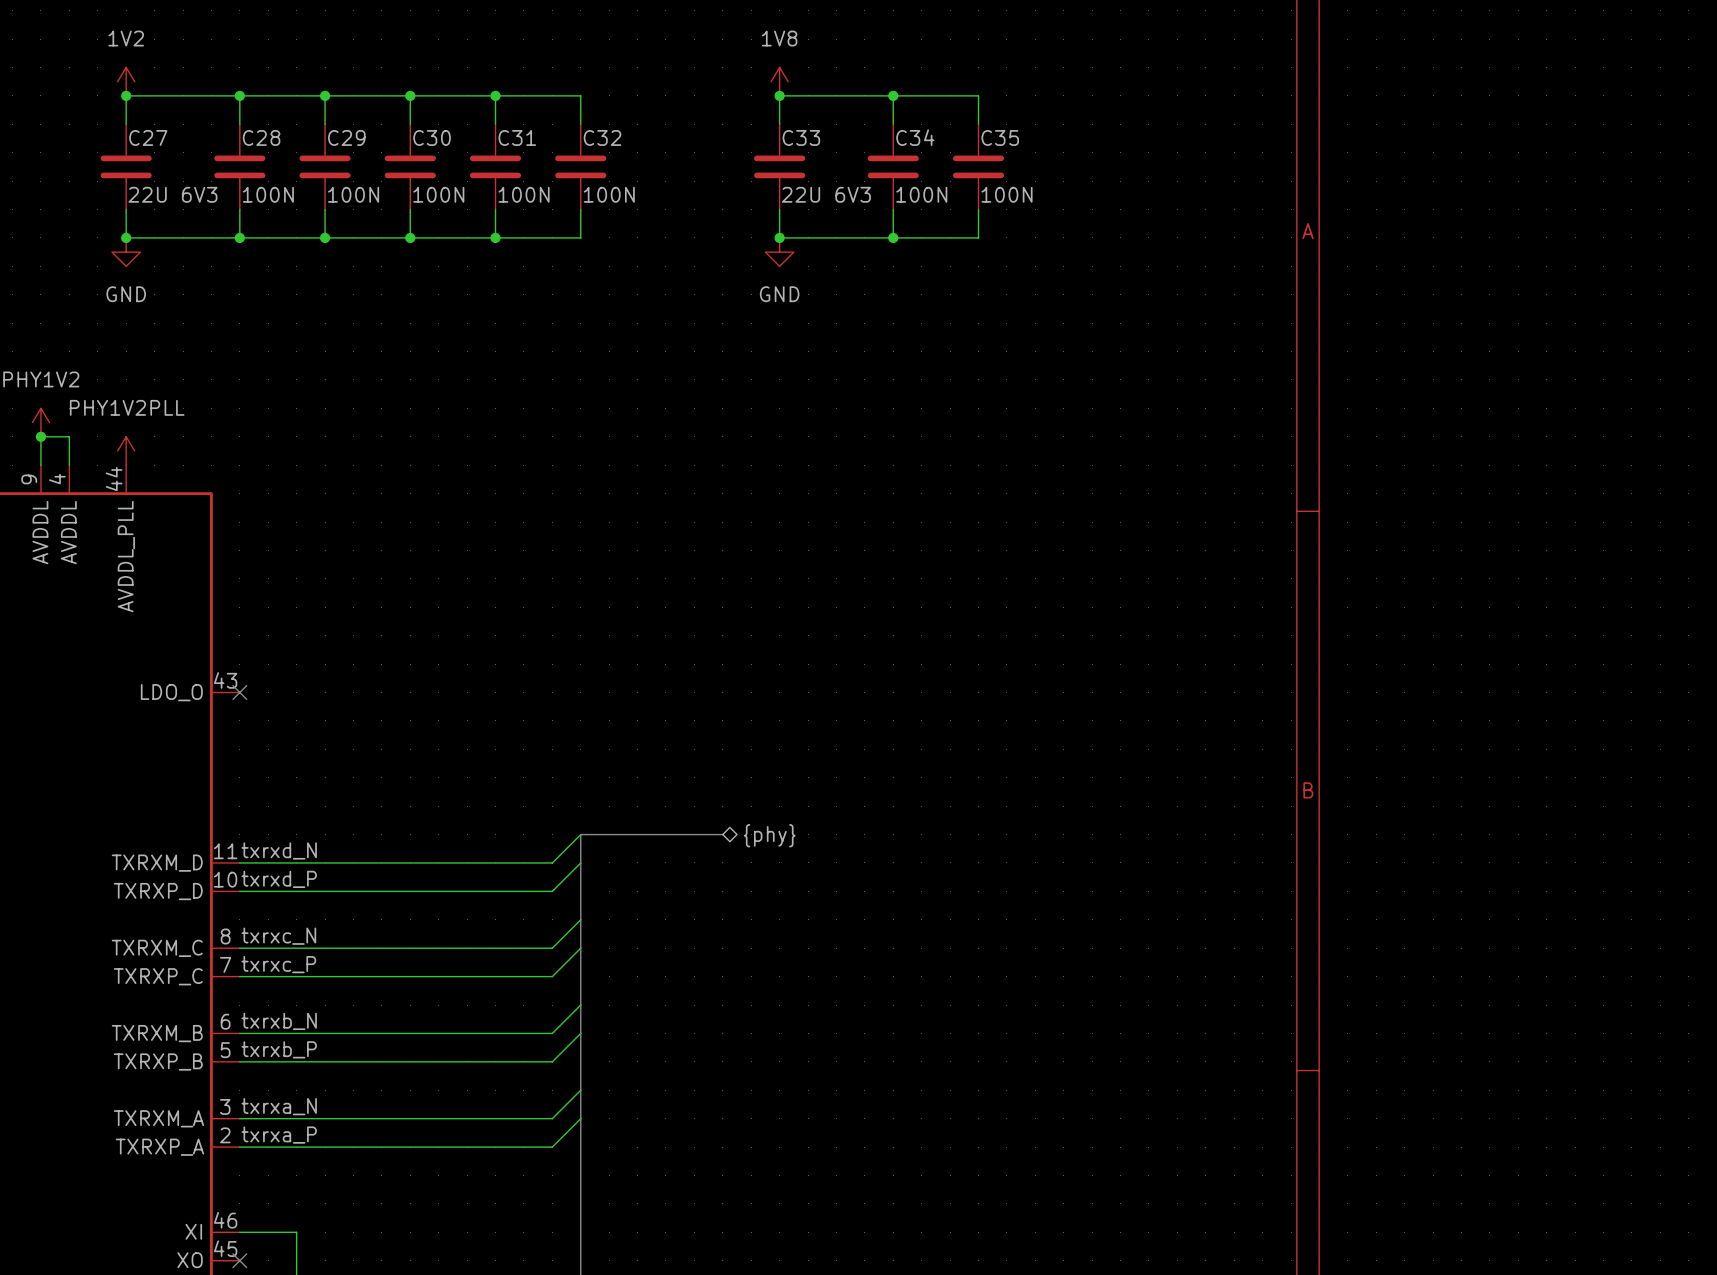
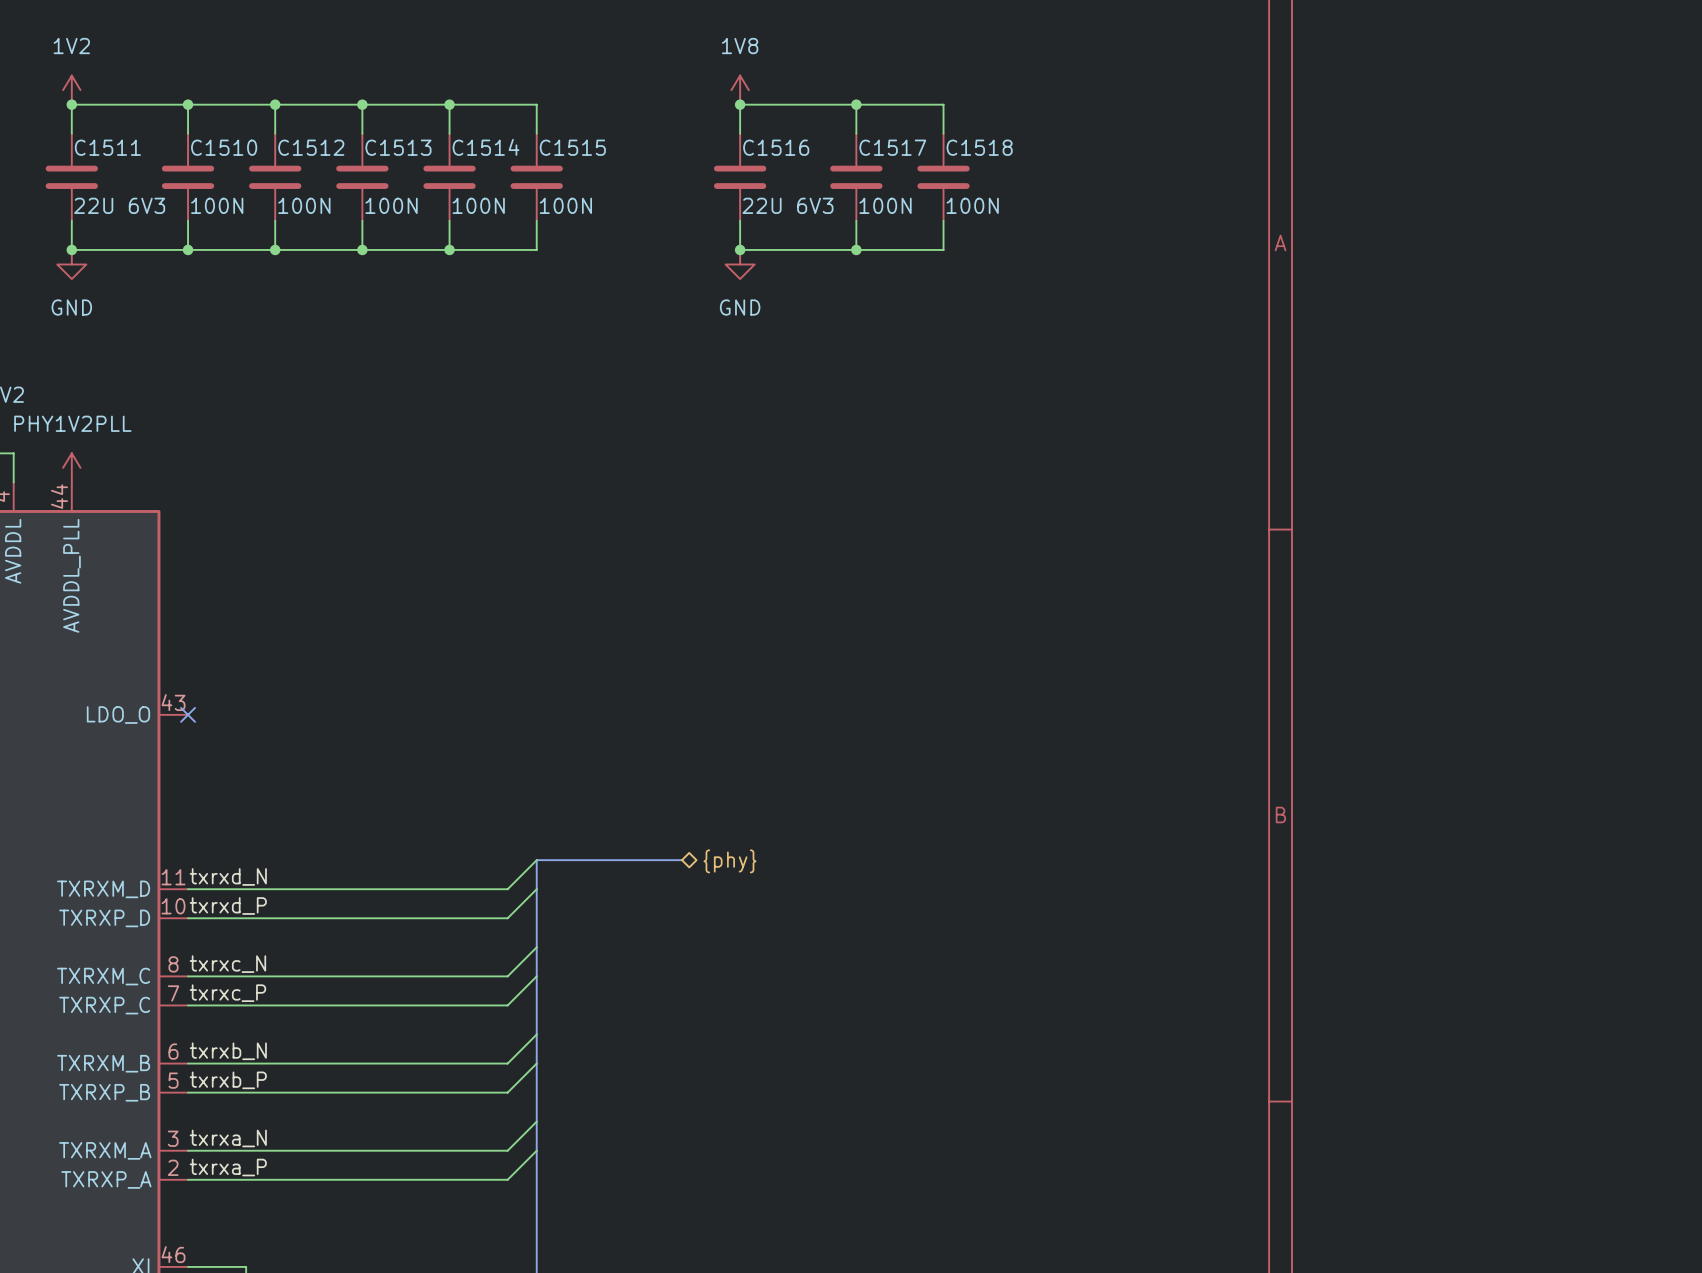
C27 name: C27 (148, 137) -> C1511 (107, 147)
C28 name: C28 (261, 137) -> C1510 (224, 147)
C29 name: C29 (346, 137) -> C1512 (311, 147)
C30 name: C30 (432, 137) -> C1513 (398, 147)
C31 name: C31 (517, 137) -> C1514 (485, 147)
C32 name: C32 (602, 137) -> C1515 (572, 147)
C33 name: C33 (801, 137) -> C1516 (776, 147)
C34 name: C34 (915, 137) -> C1517 (892, 147)
C35 name: C35 (1000, 137) -> C1518 (979, 147)

